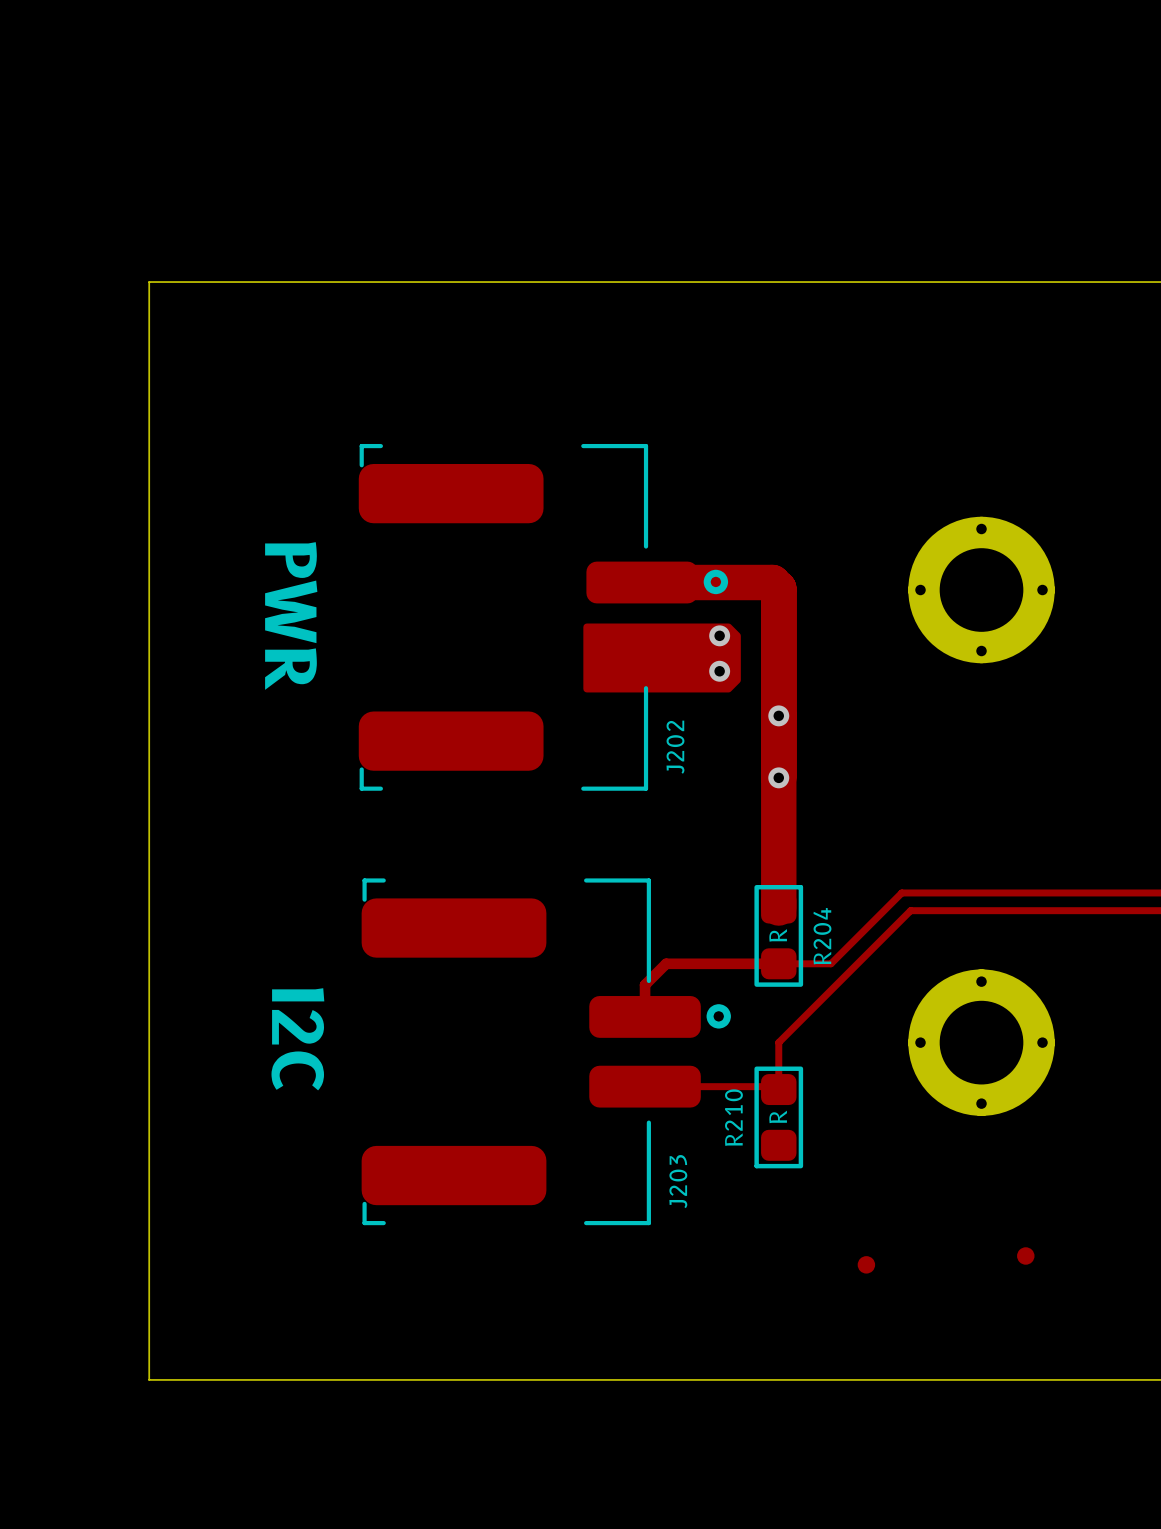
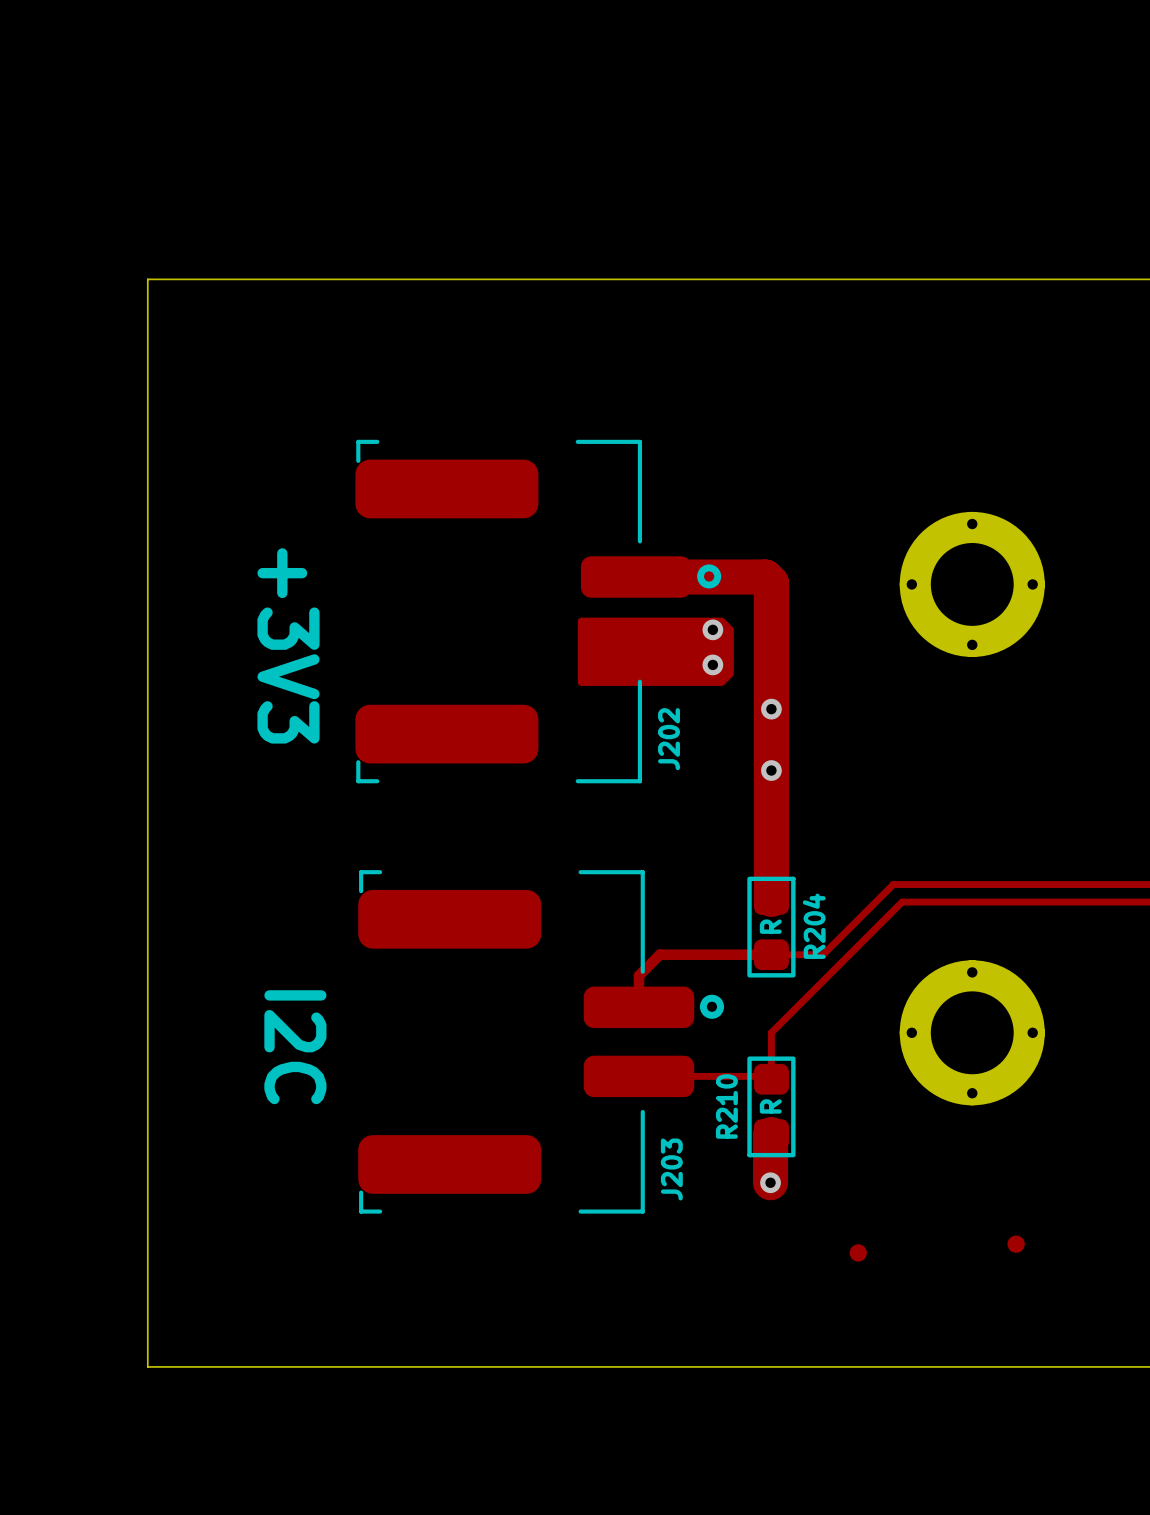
text: PWR (291, 616) -> +3V3 (288, 645)
track: none -> (771, 1134) (770, 1182)
via: none -> (770, 1182)

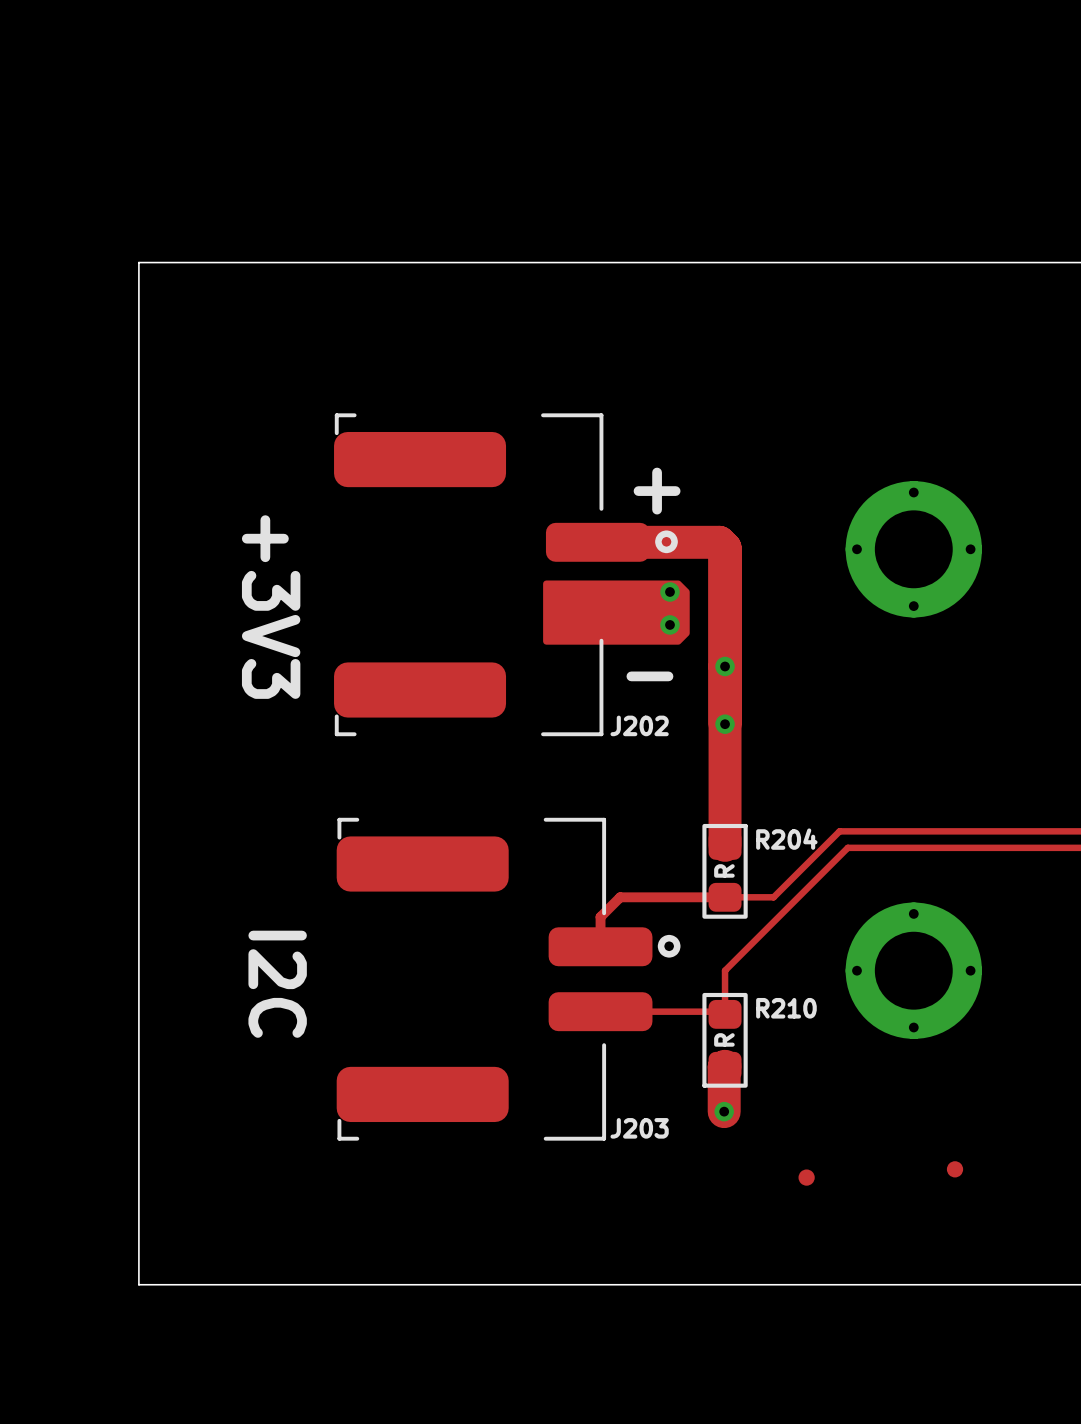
text: none -> + (657, 491)
text: none -> - (649, 676)
J202 name rotation: 0° (669, 739) -> 90° clockwise (639, 725)
R204 name rotation: 0° (814, 926) -> 90° clockwise (786, 839)
R210 name rotation: 0° (726, 1106) -> 90° clockwise (786, 1008)
R210 name position: R210 (726, 1106) -> R210 (786, 1008)
J203 name rotation: 0° (671, 1169) -> 90° clockwise (639, 1128)

